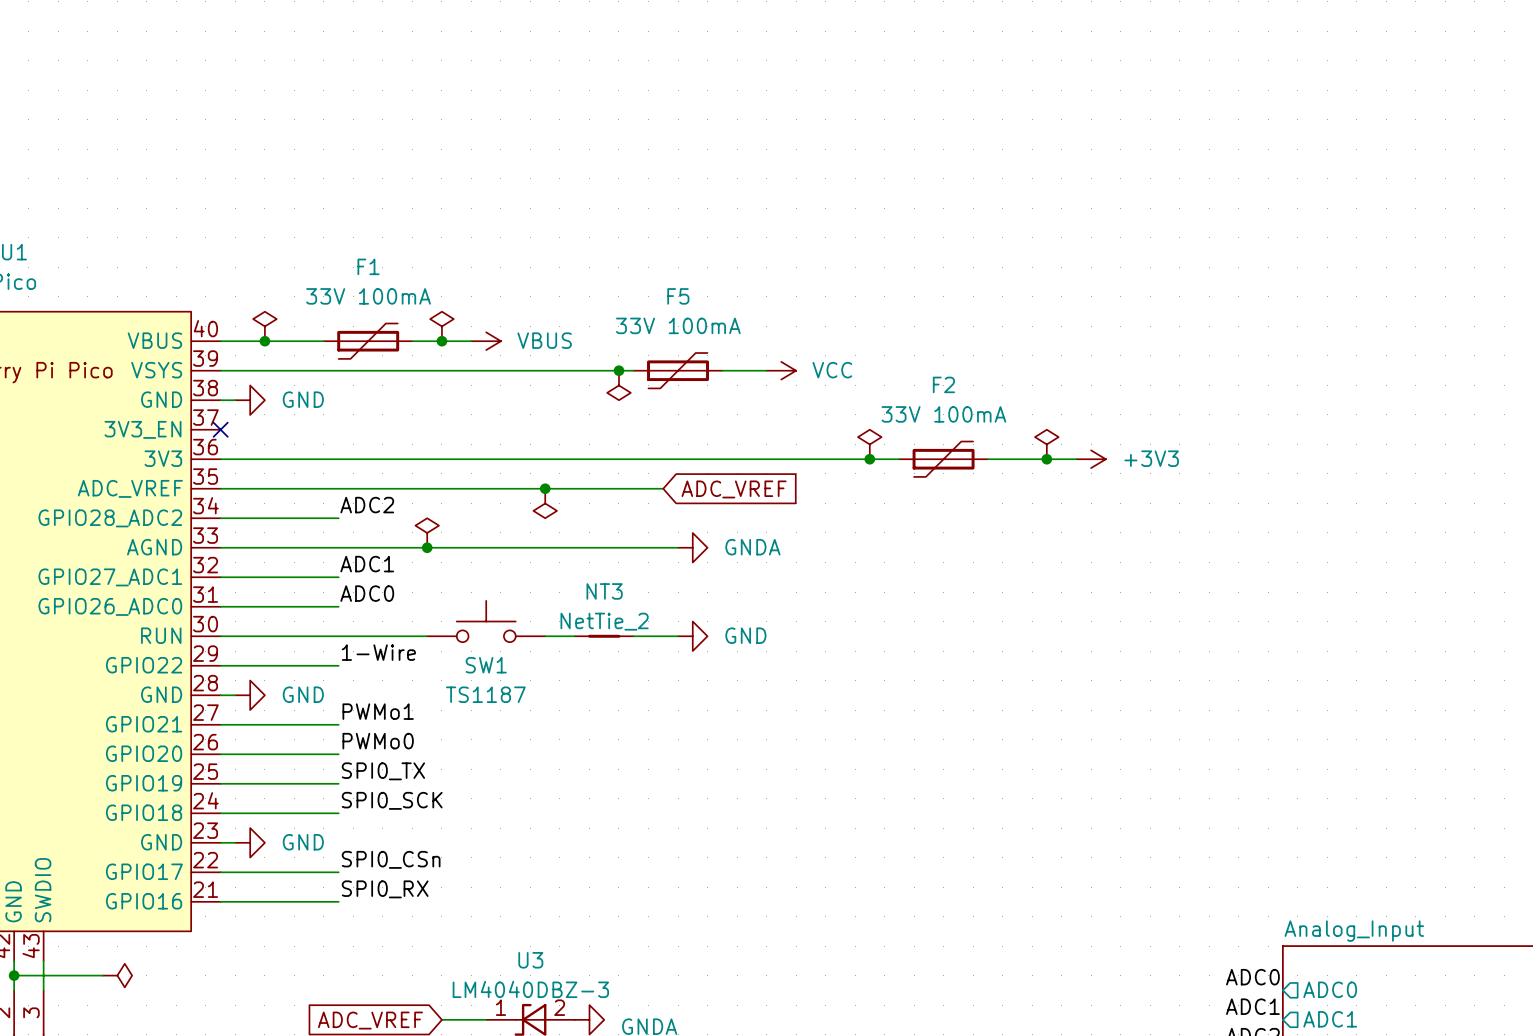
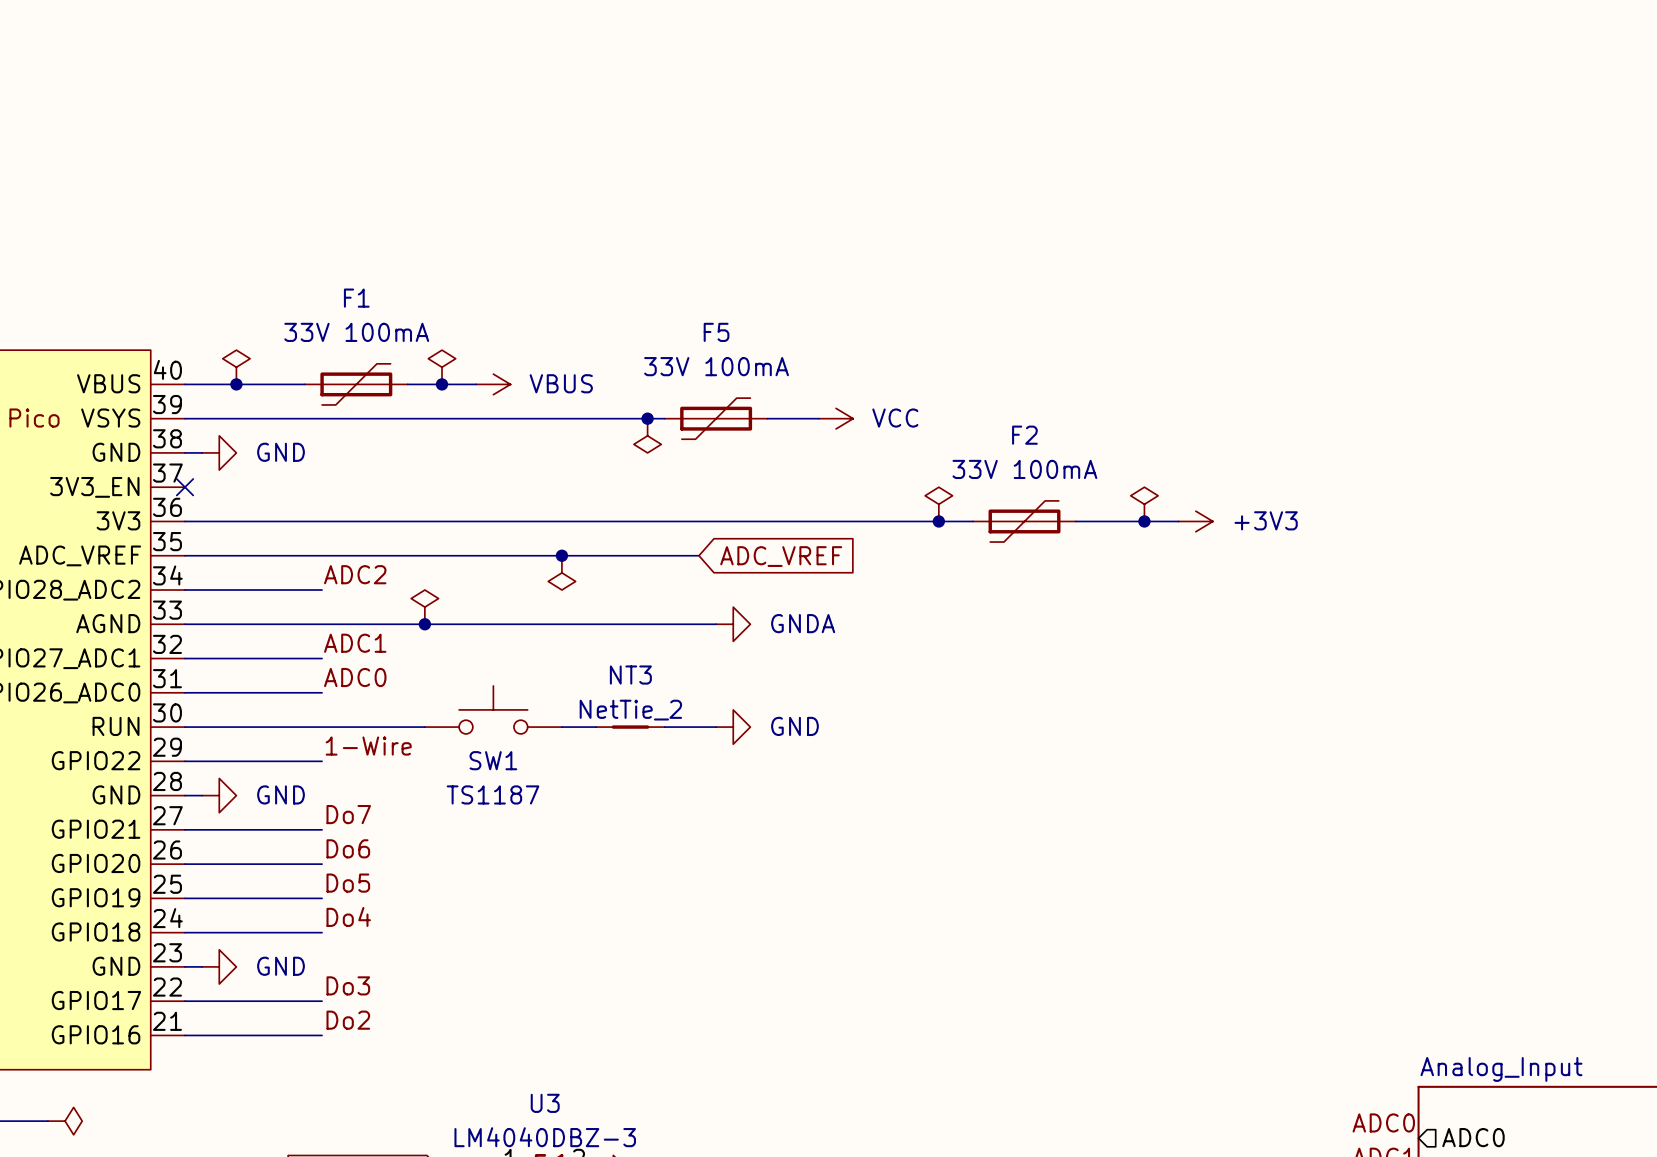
label: PWMo1 (378, 711) -> Do7 (348, 814)
label: PWMo0 (378, 741) -> Do6 (348, 848)
label: SPI0_TX (383, 771) -> Do5 (348, 883)
label: SPI0_SCK (392, 800) -> Do4 (348, 916)
label: SPI0_CSn (391, 859) -> Do3 (348, 985)
label: SPI0_RX (385, 889) -> Do2 (348, 1020)

